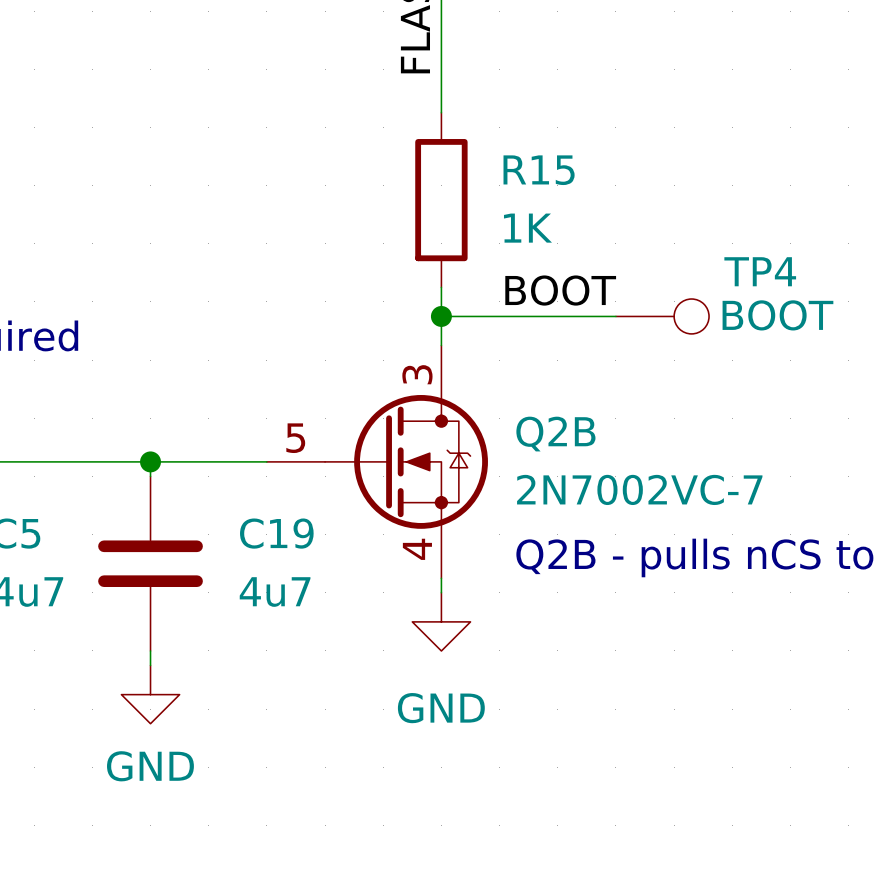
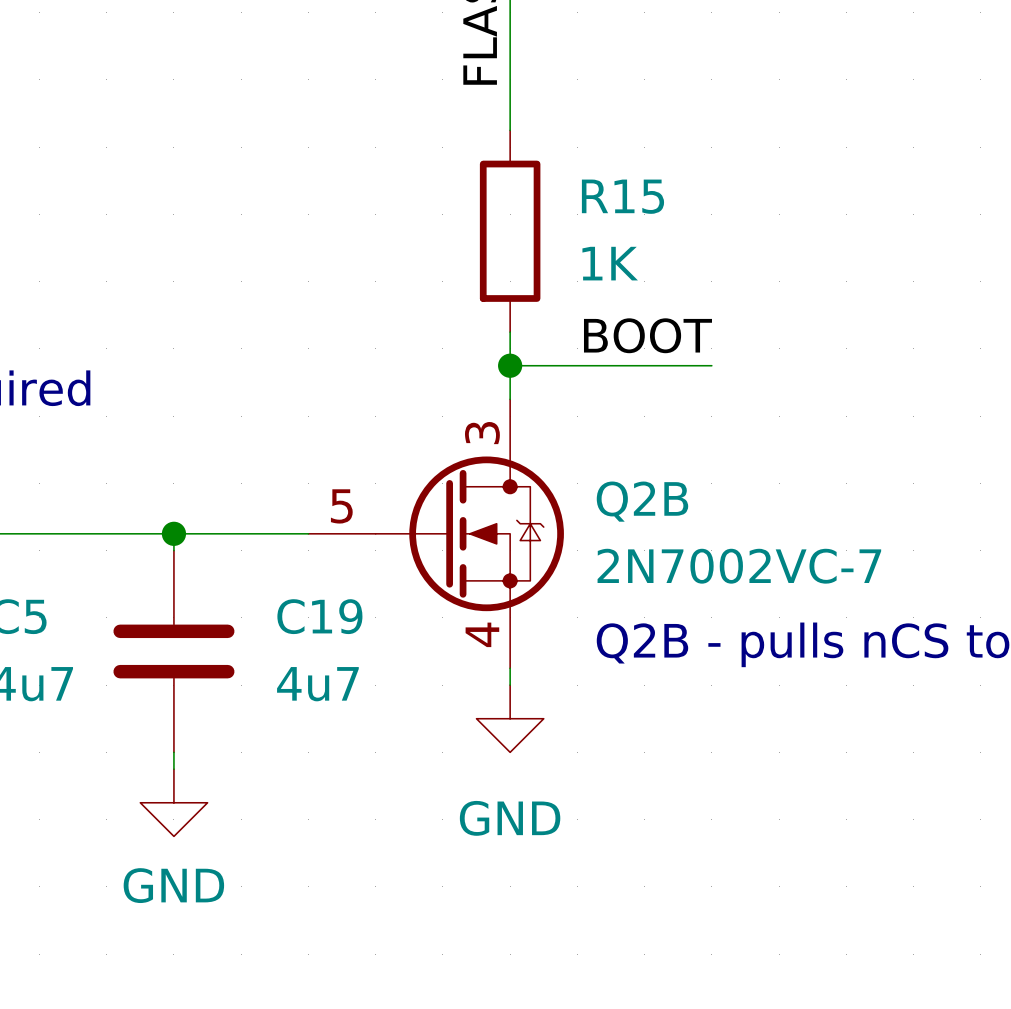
TP4: BOOT (662, 316) -> none

